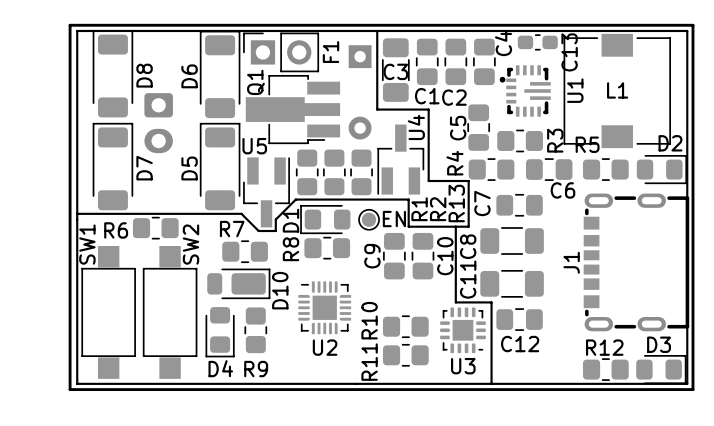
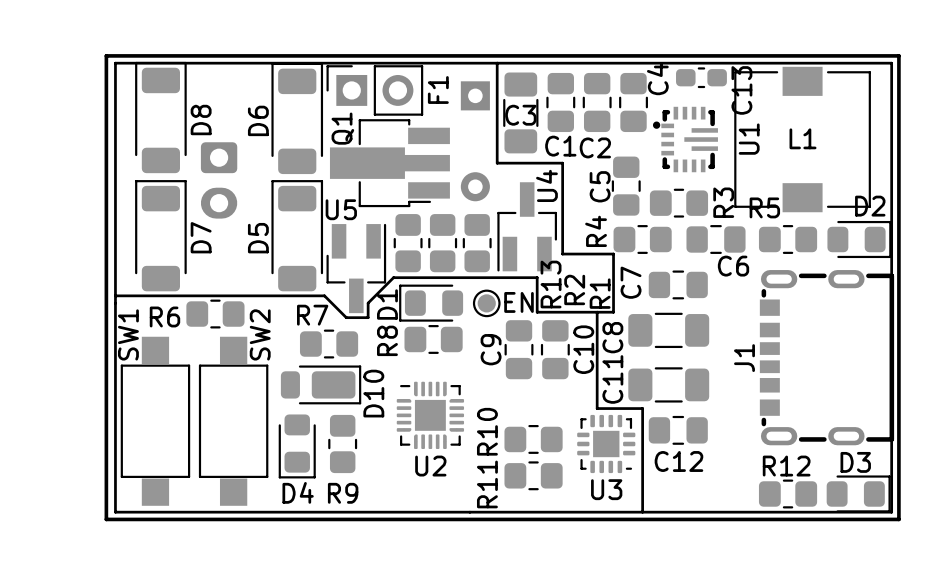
R13 name: R13 (456, 203) -> R1 (600, 293)
R1 name: R1 (419, 209) -> R13 (551, 284)

